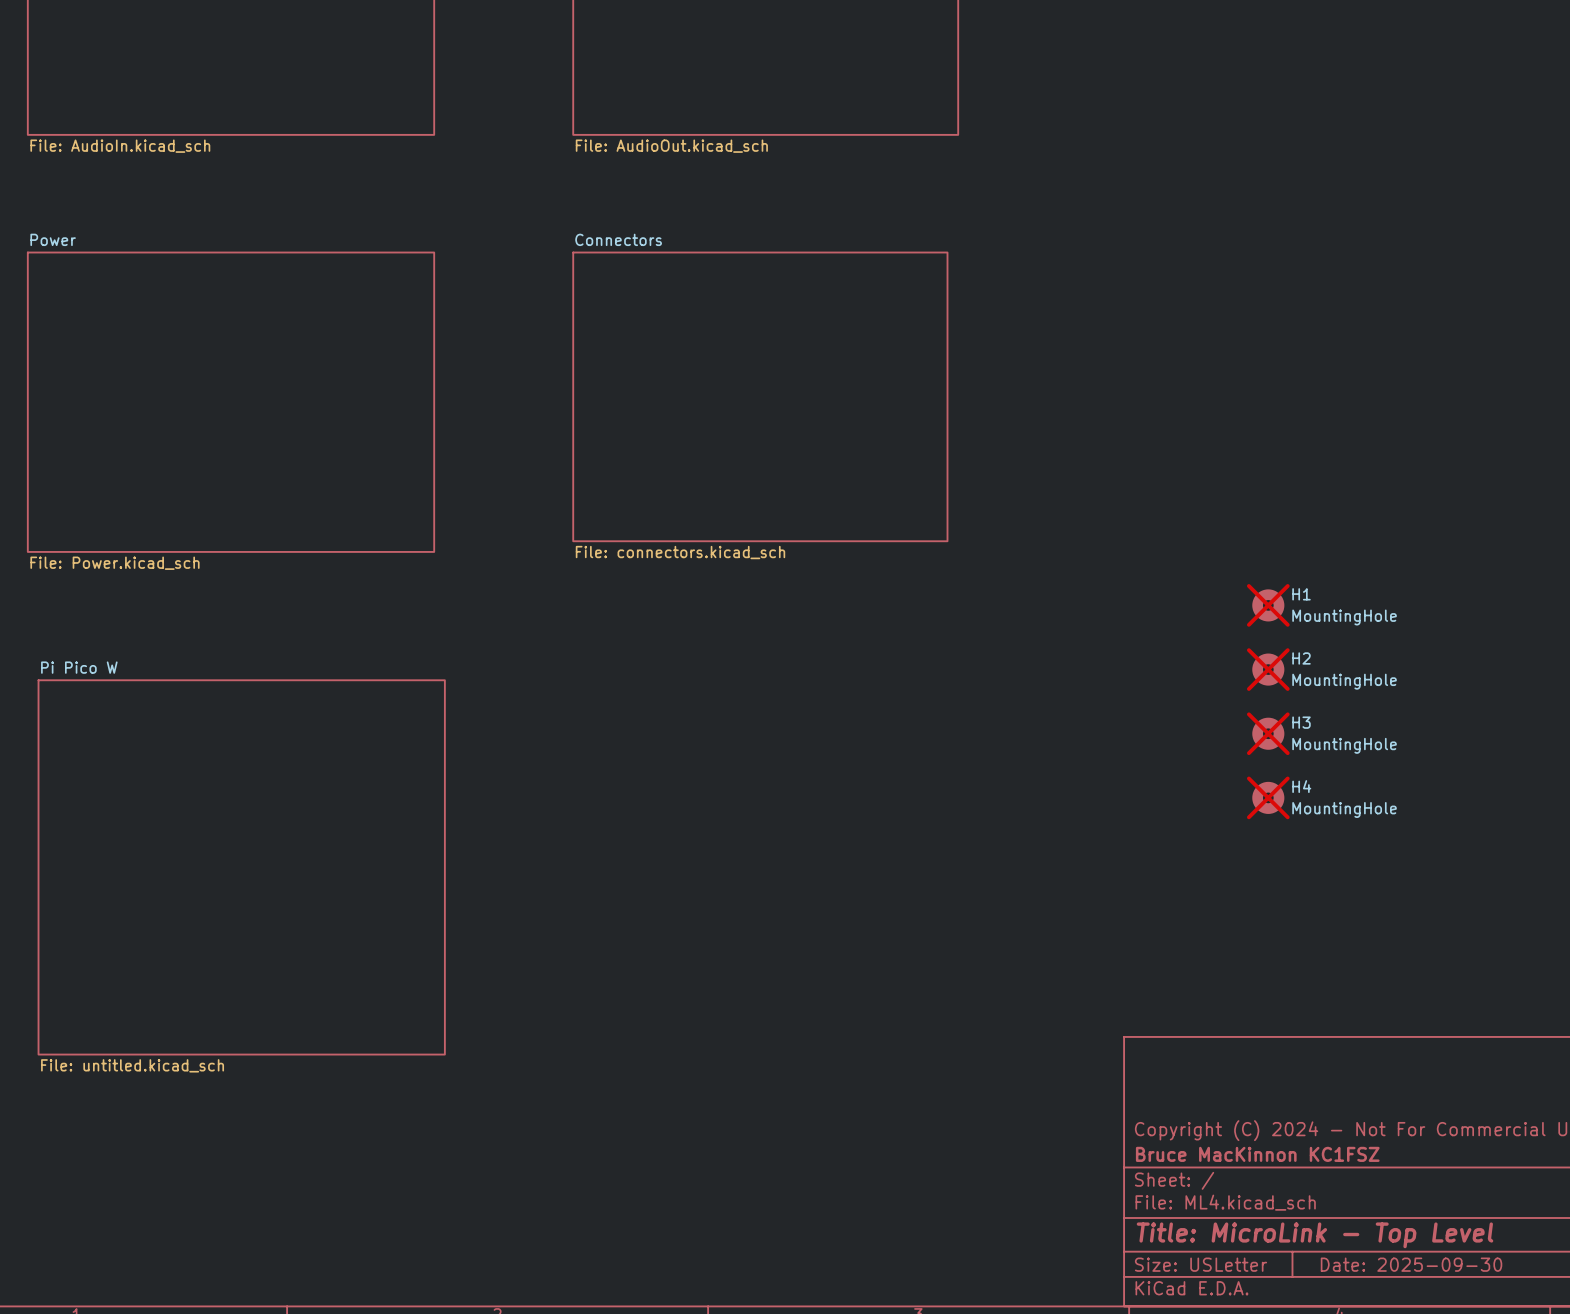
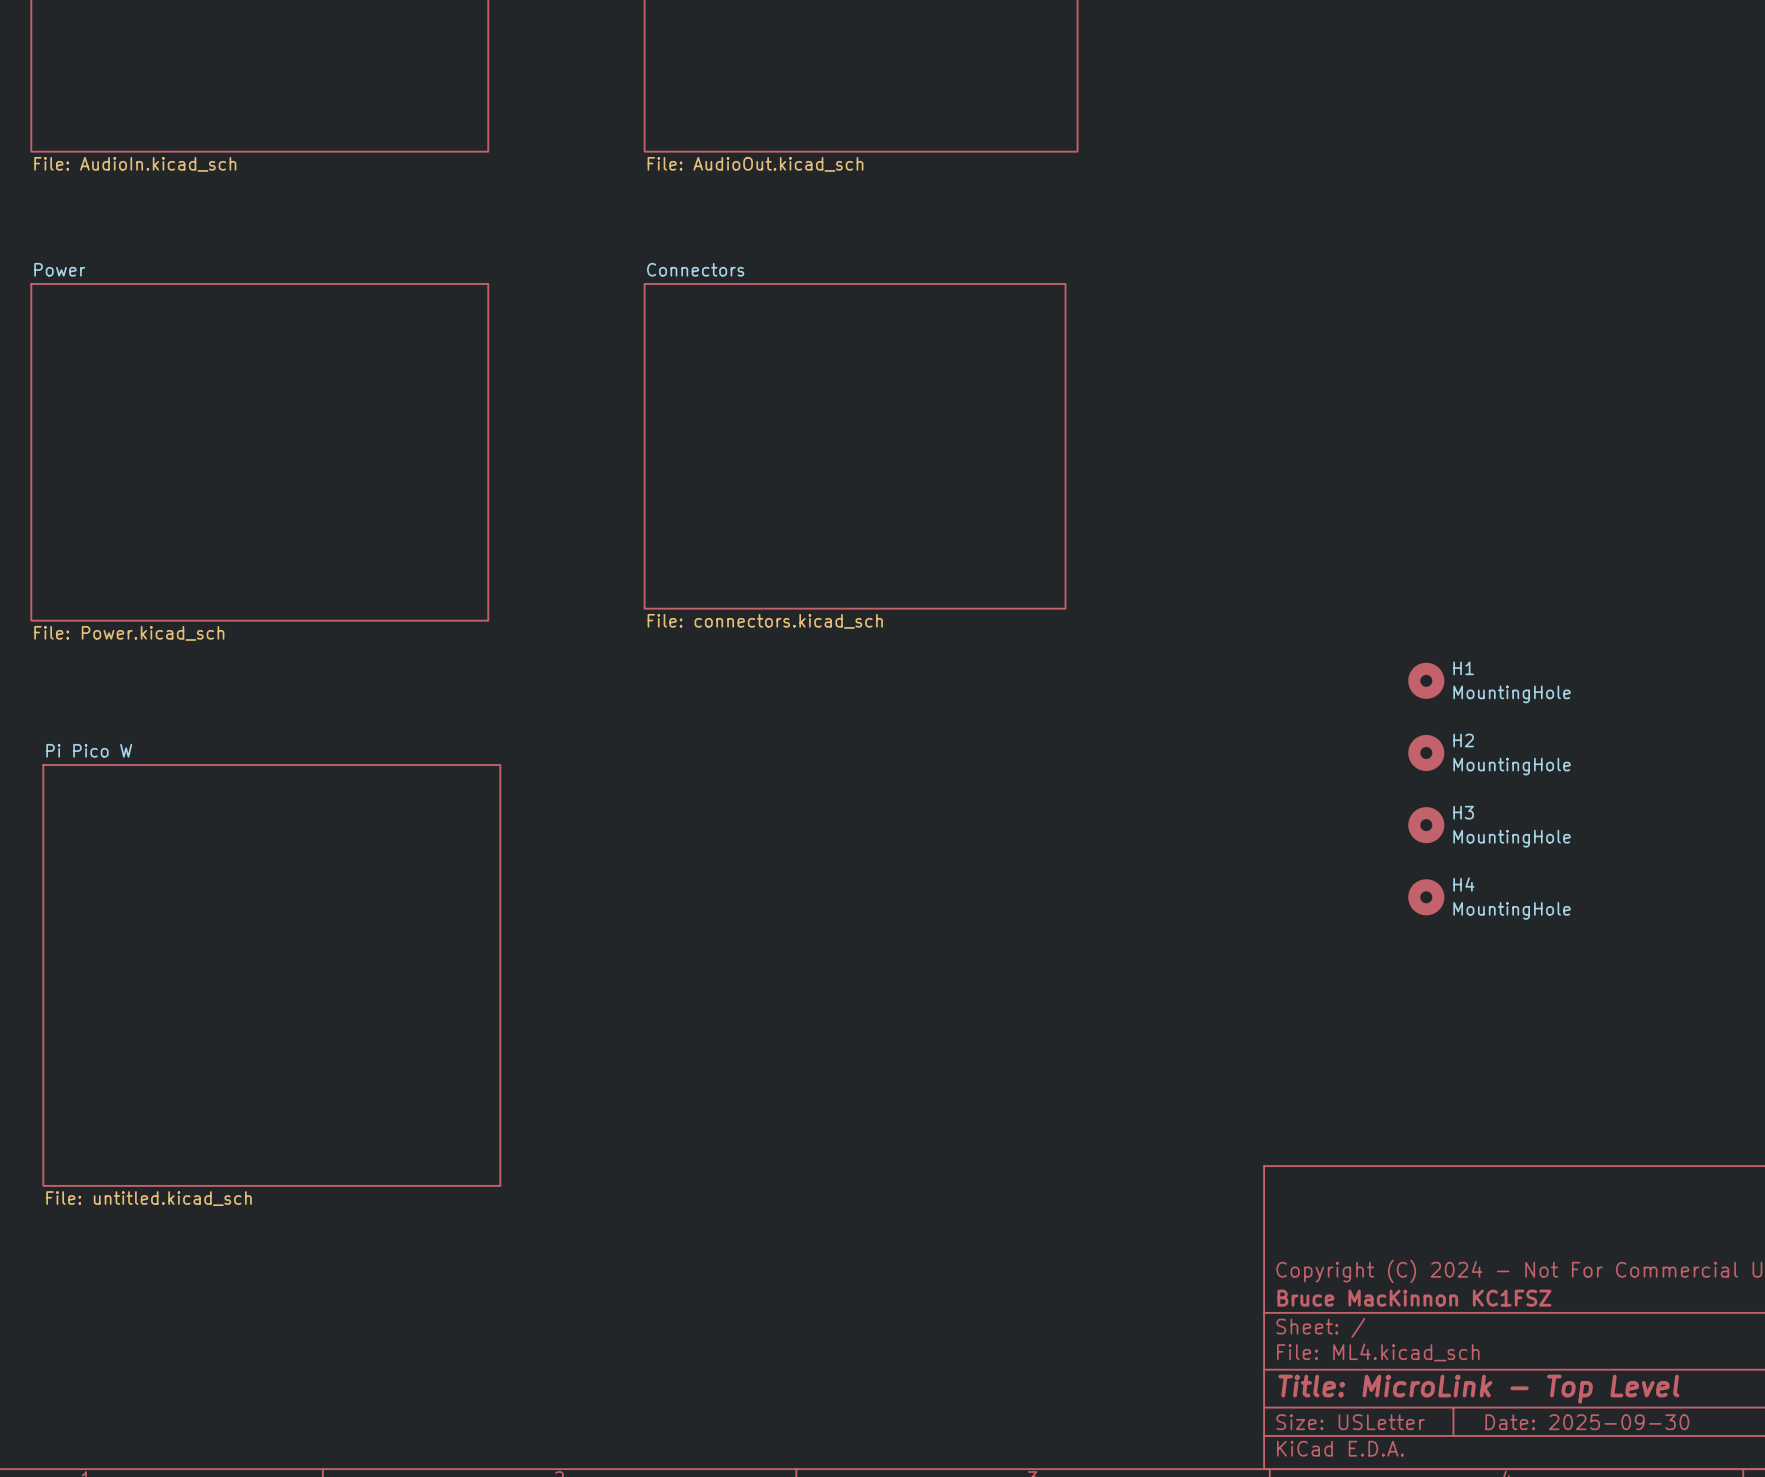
H1 do-not-place cross: (1268, 605) -> none
H2 do-not-place cross: (1268, 669) -> none
H3 do-not-place cross: (1268, 733) -> none
H4 do-not-place cross: (1268, 797) -> none

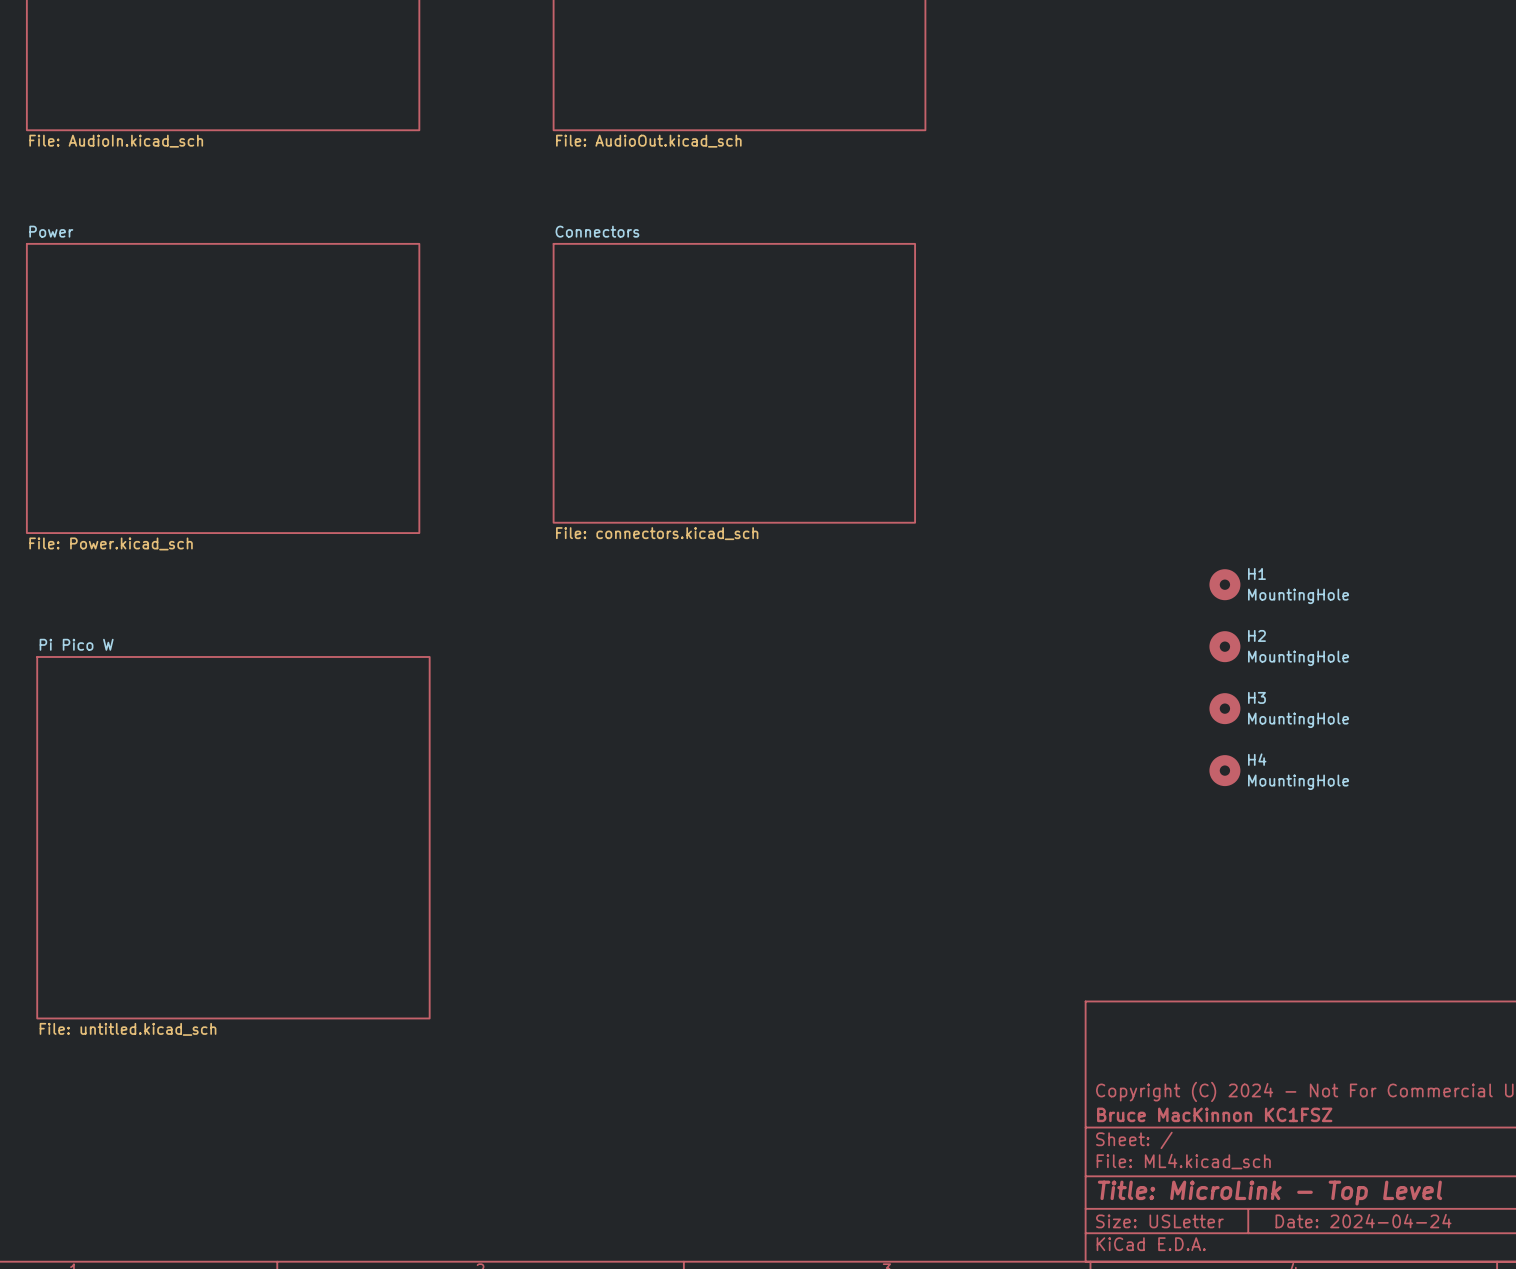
title block: Date: 2025-09-30 (1587, 1422) -> Date: 2024-04-24 (1363, 1221)

